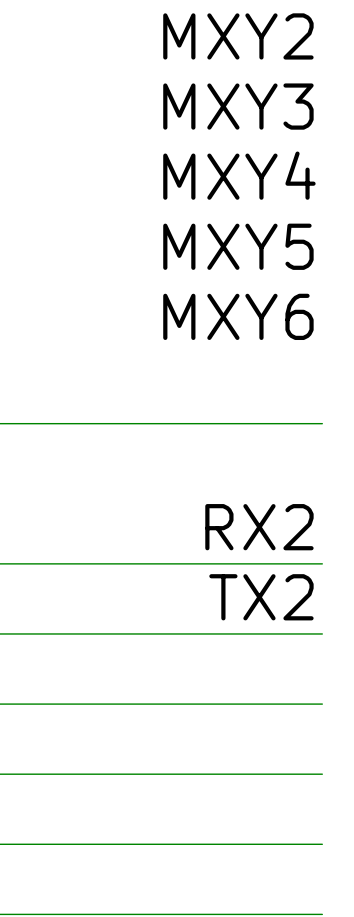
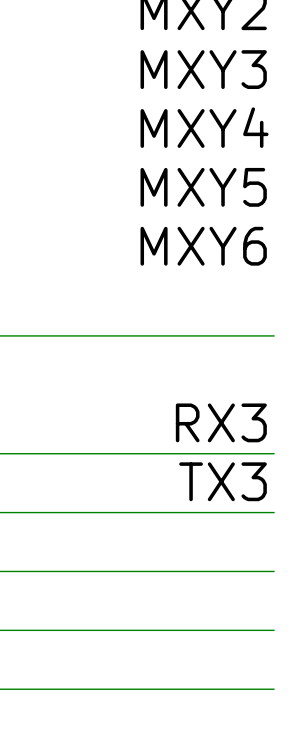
label: RX2 (259, 527) -> RX3 (221, 422)
label: TX2 (261, 597) -> TX3 (223, 481)

